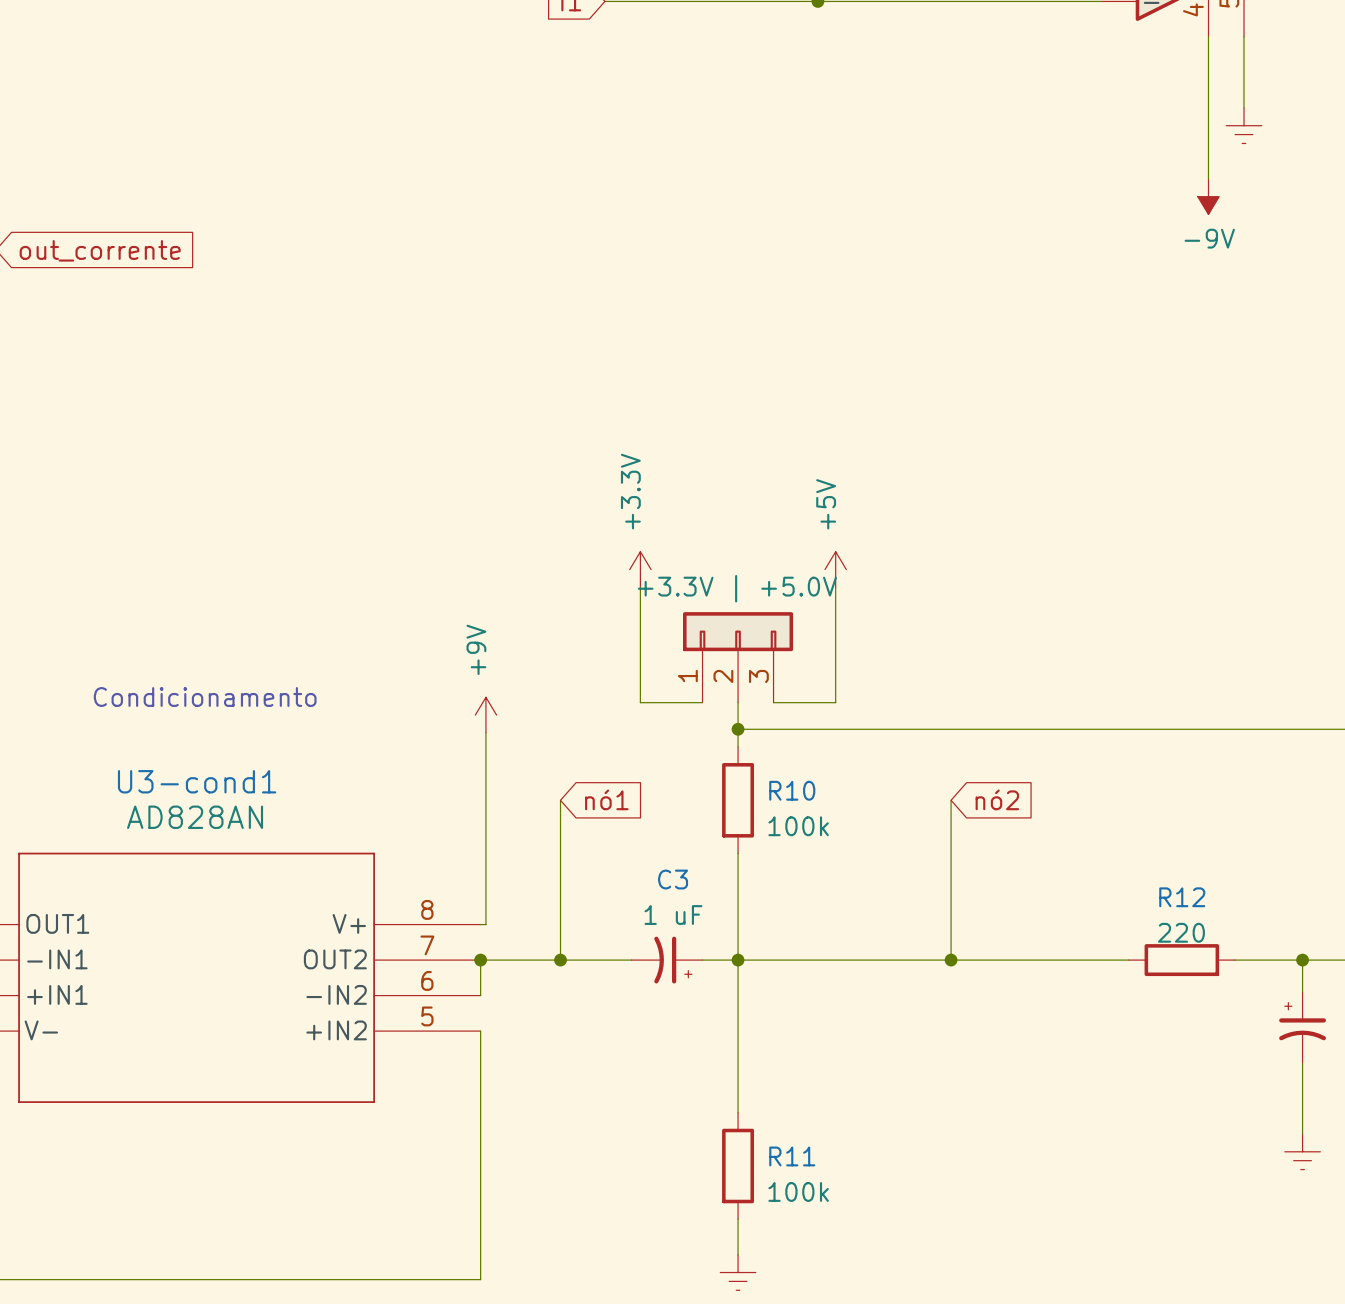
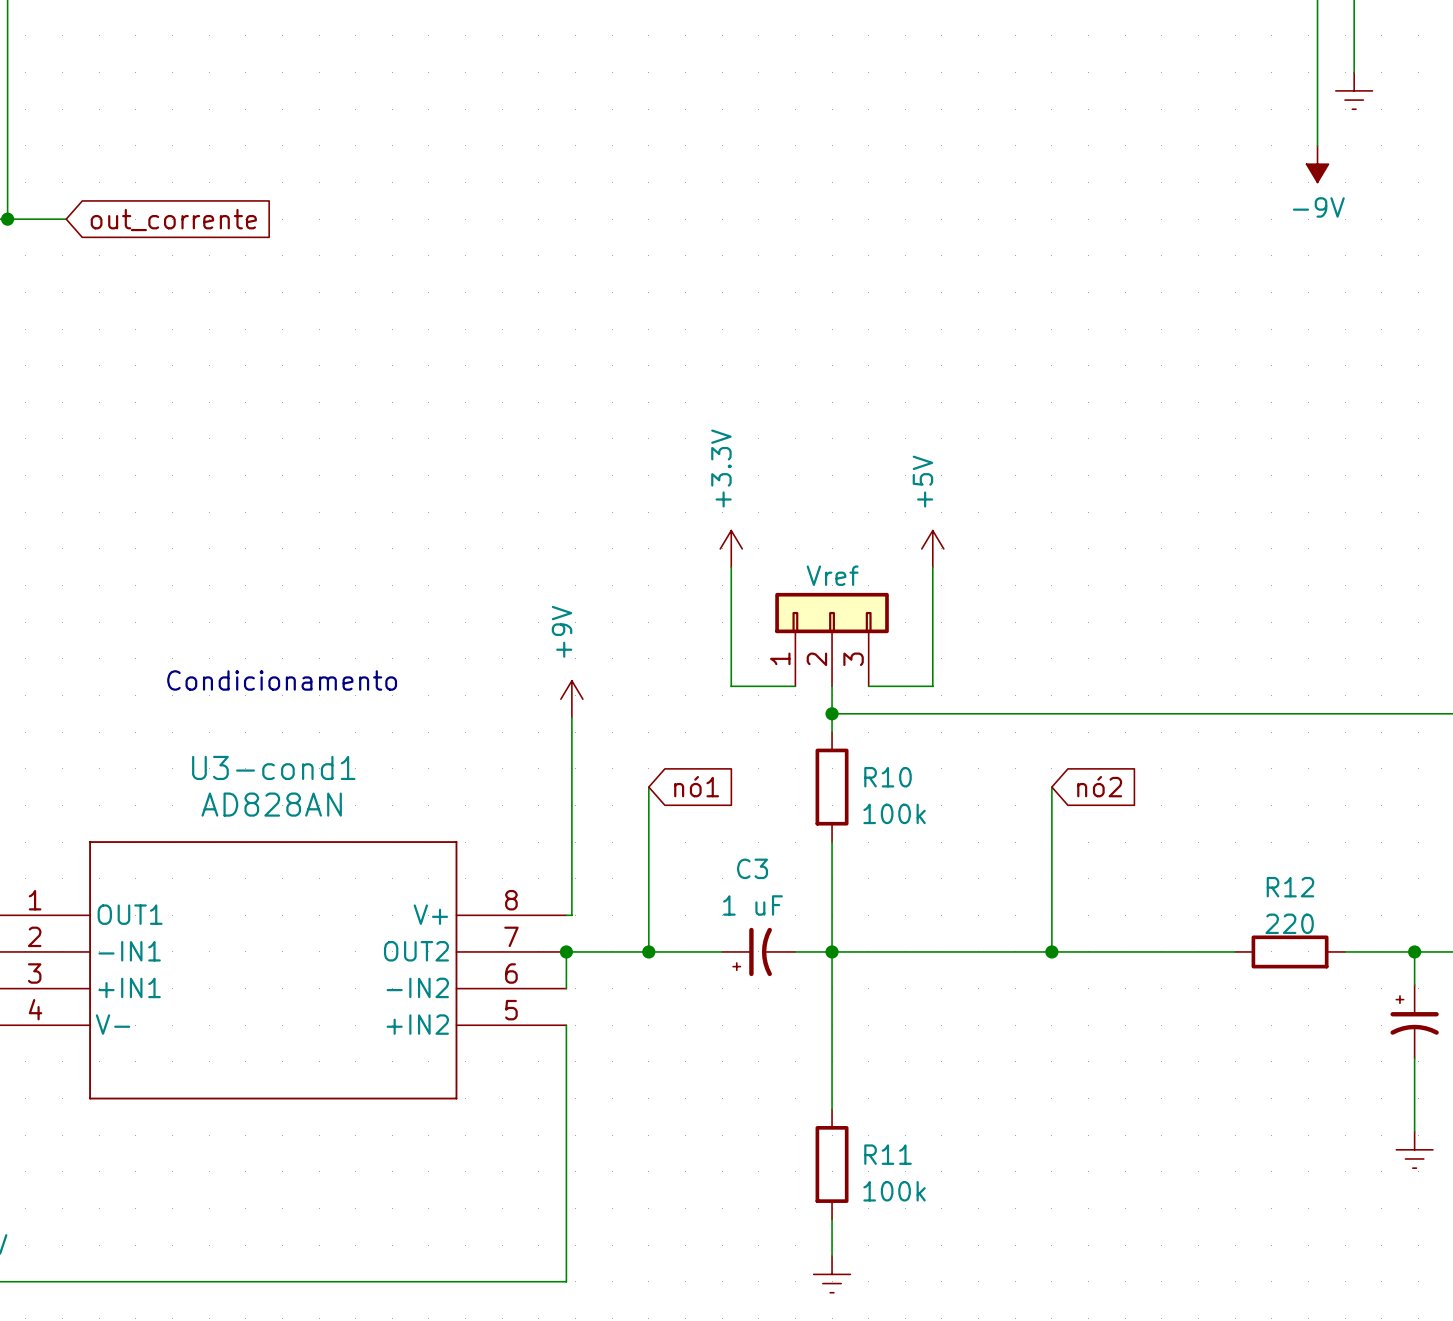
part value: +3.3V | +5.0V (737, 588) -> Vref (832, 575)
C3 flip: as is (673, 960) -> left-right (752, 951)

